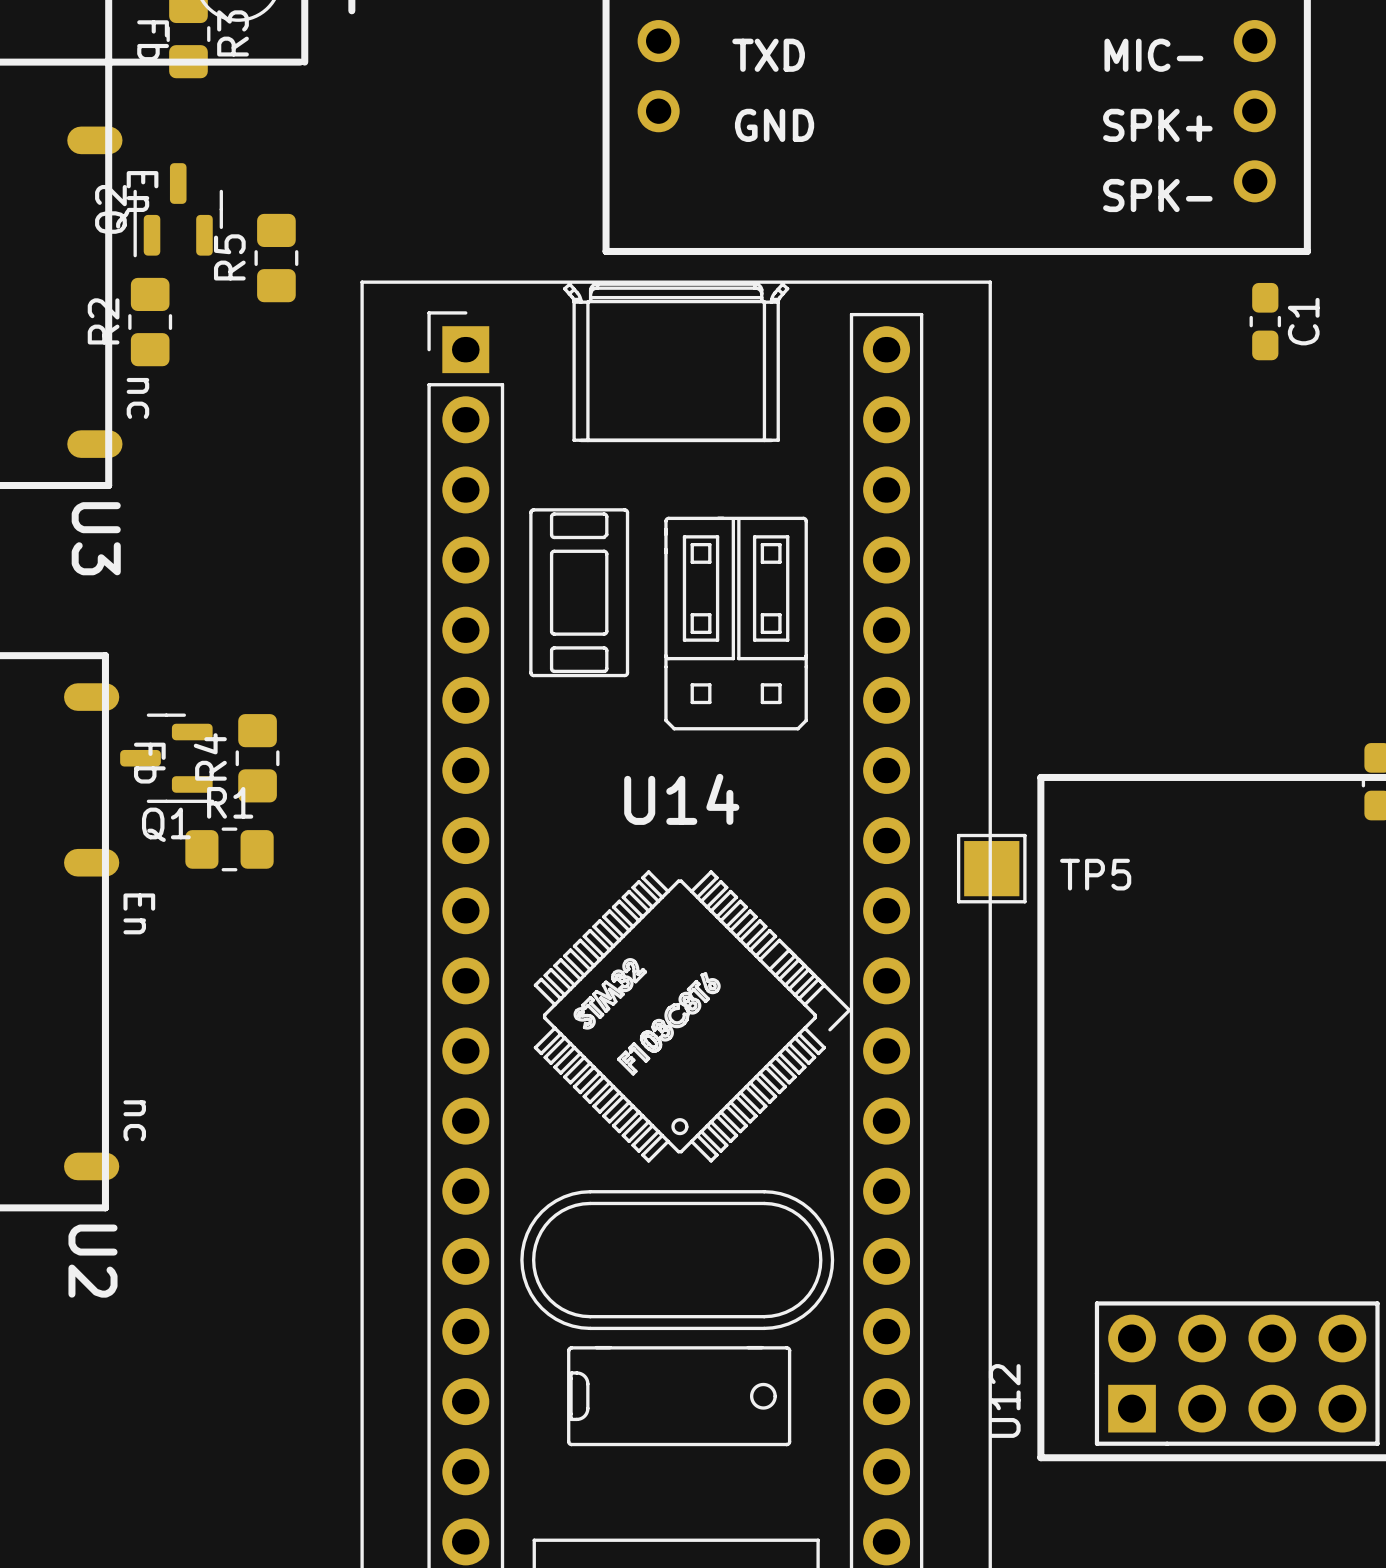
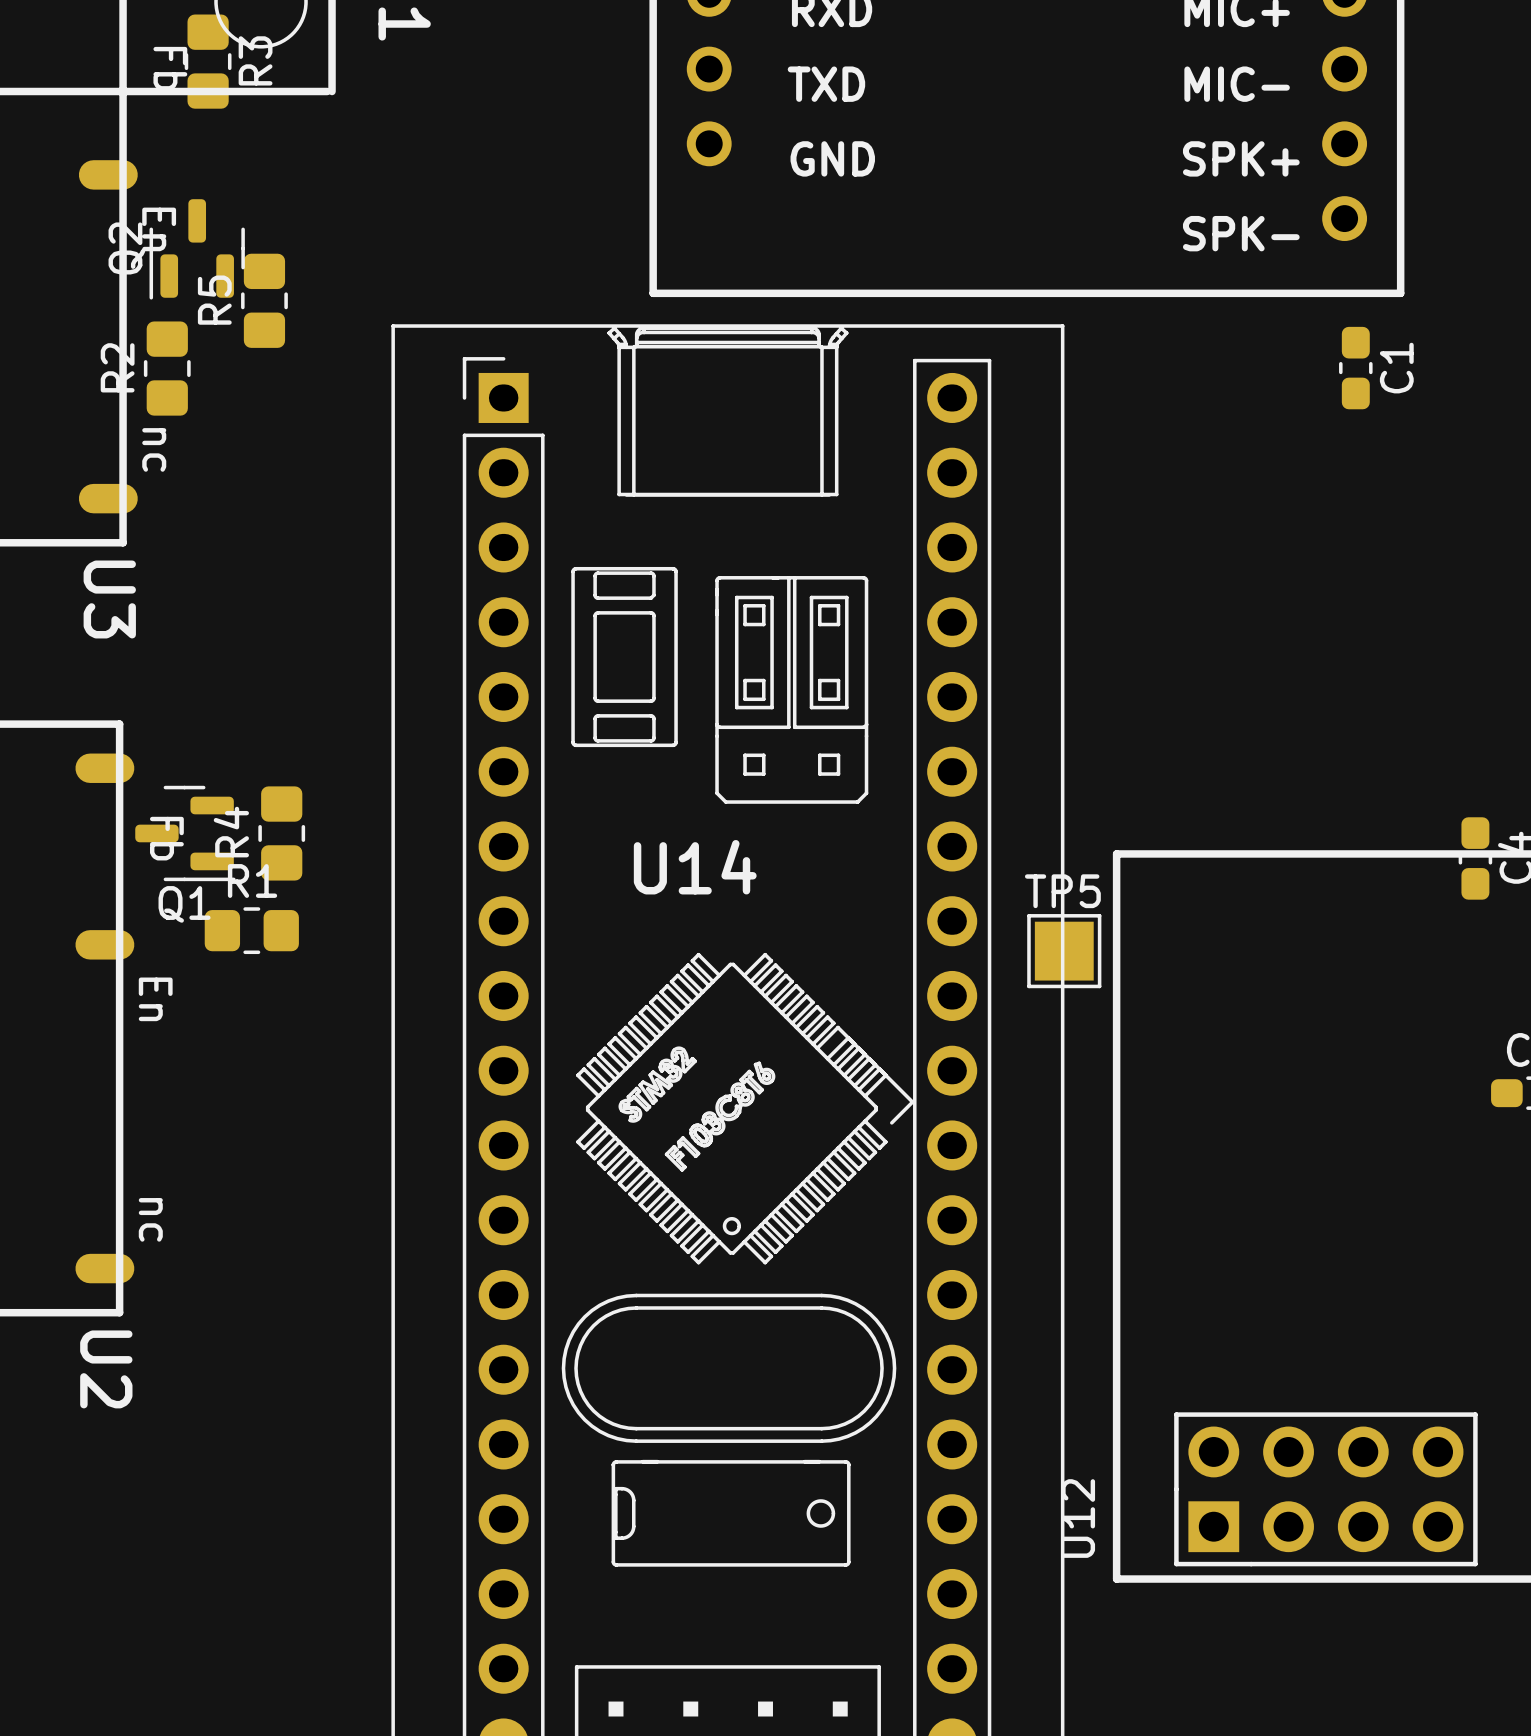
R5 position: (276, 258) -> (264, 300)
U14 name position: U14 (681, 799) -> U14 (695, 867)
TP5 name position: TP5 (1095, 874) -> TP5 (1062, 891)

